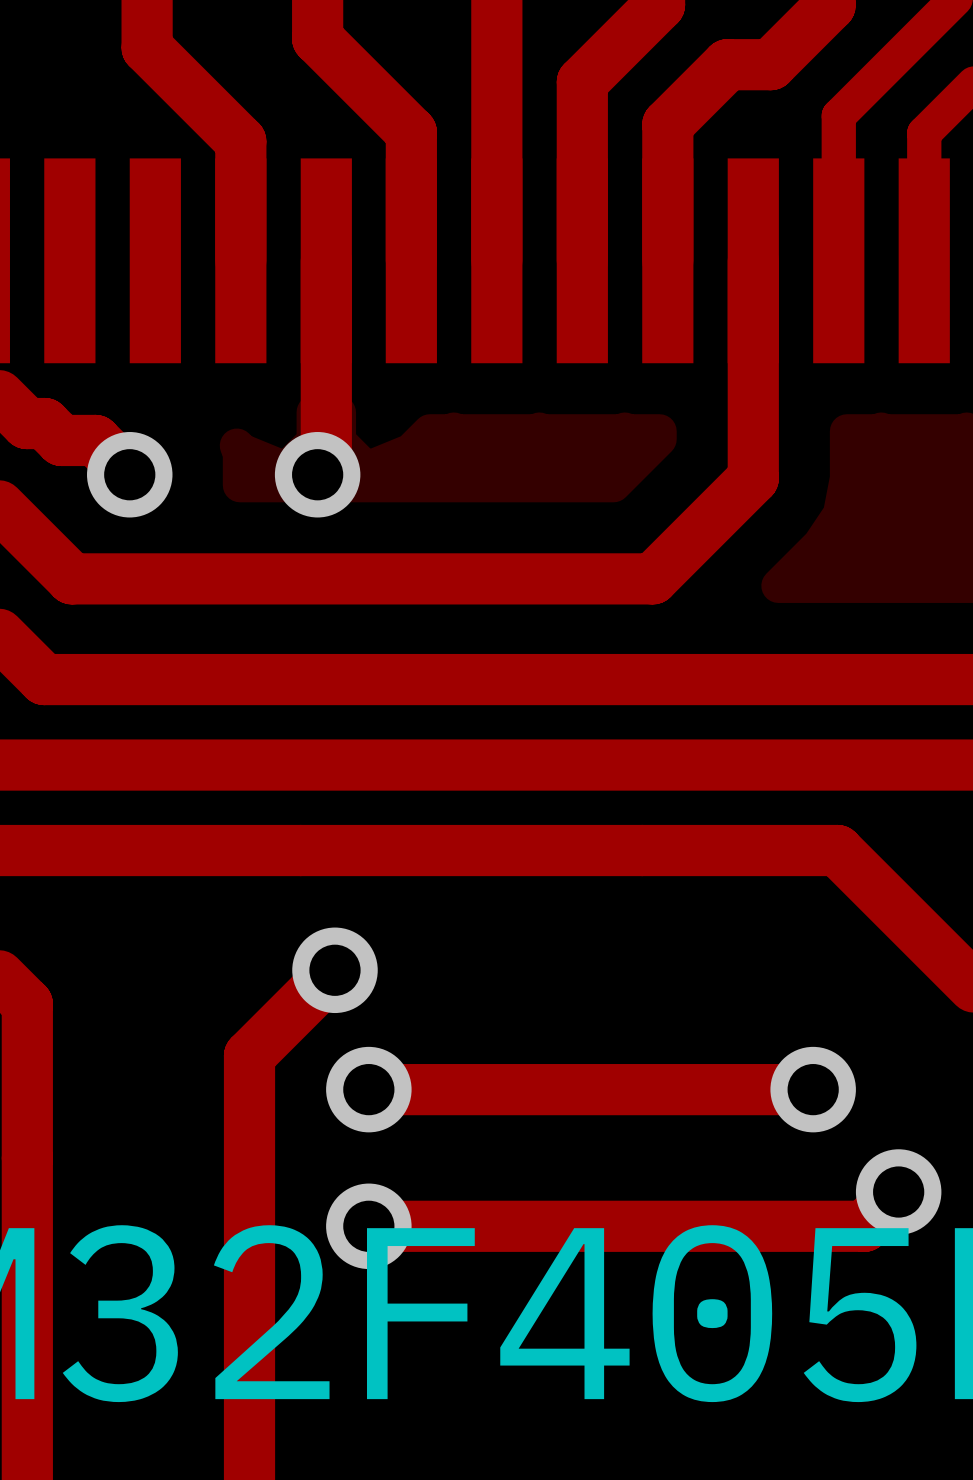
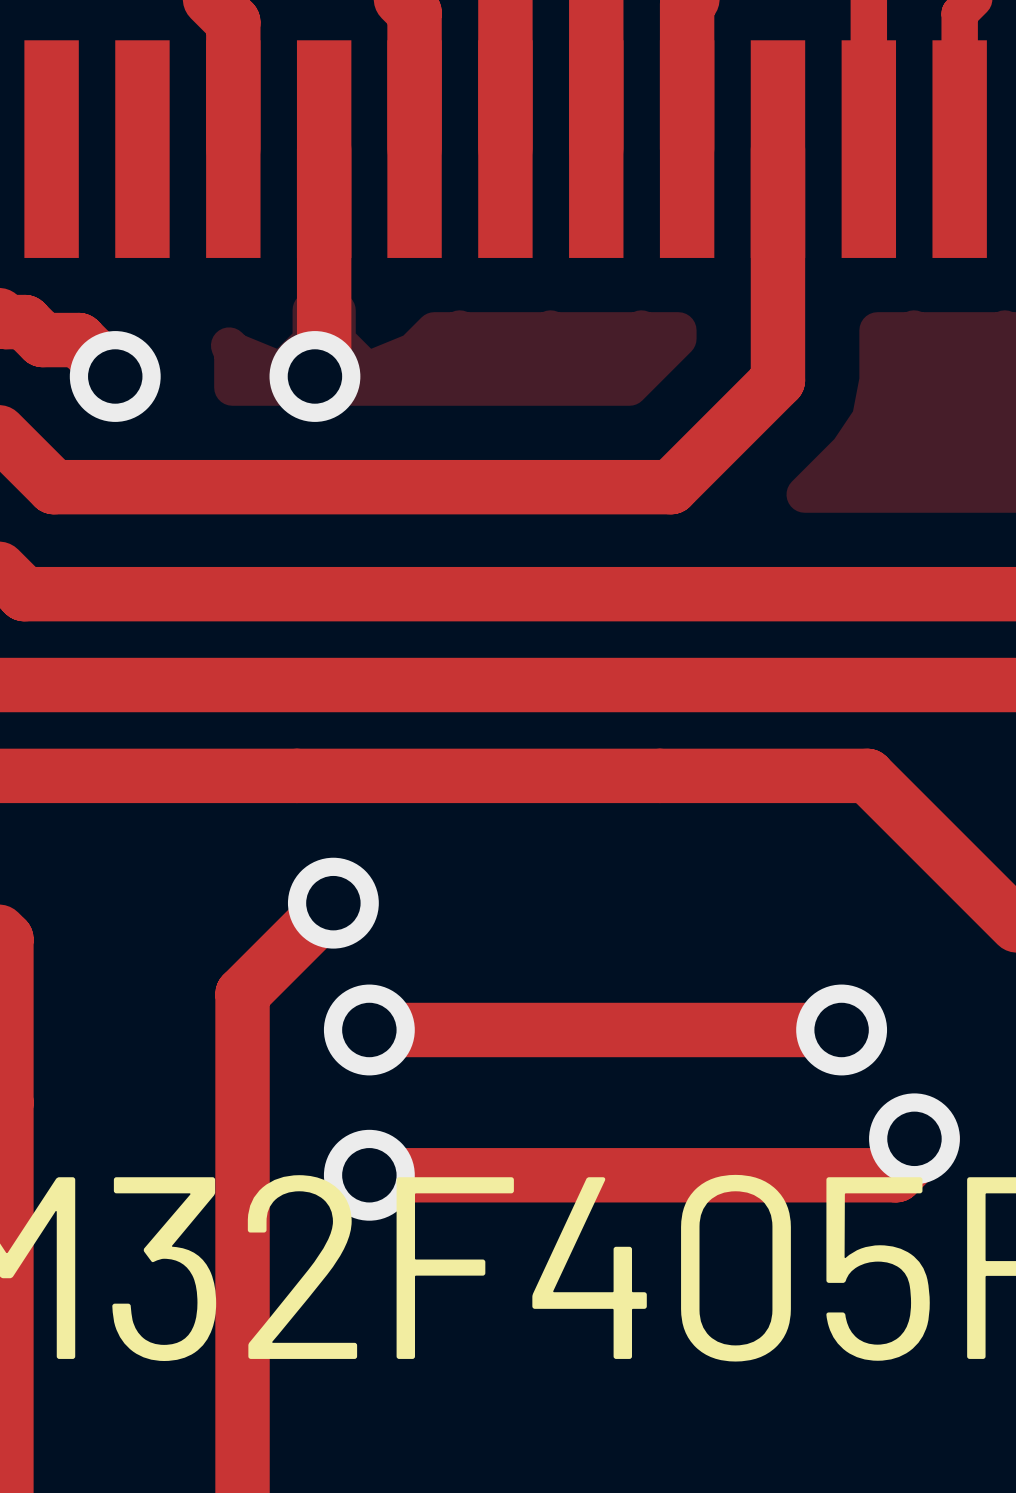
via position: (898, 1192) -> (914, 1138)

